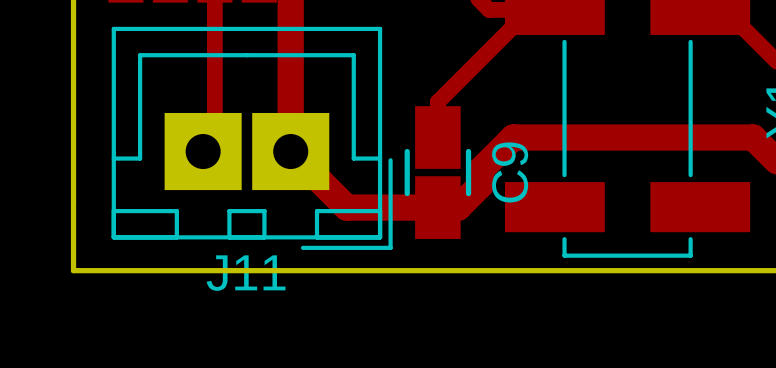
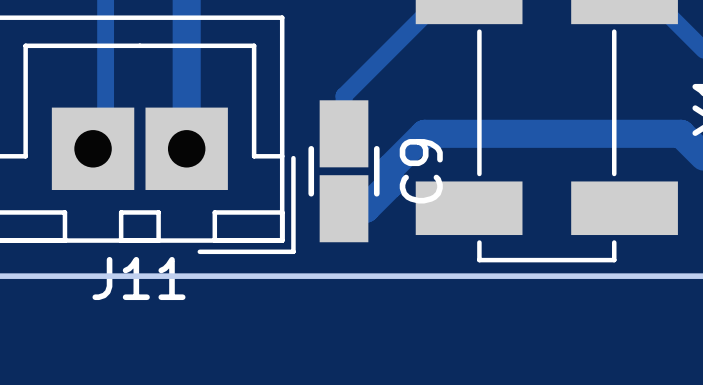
track: (290, 151) (346, 207) (437, 207) -> none

